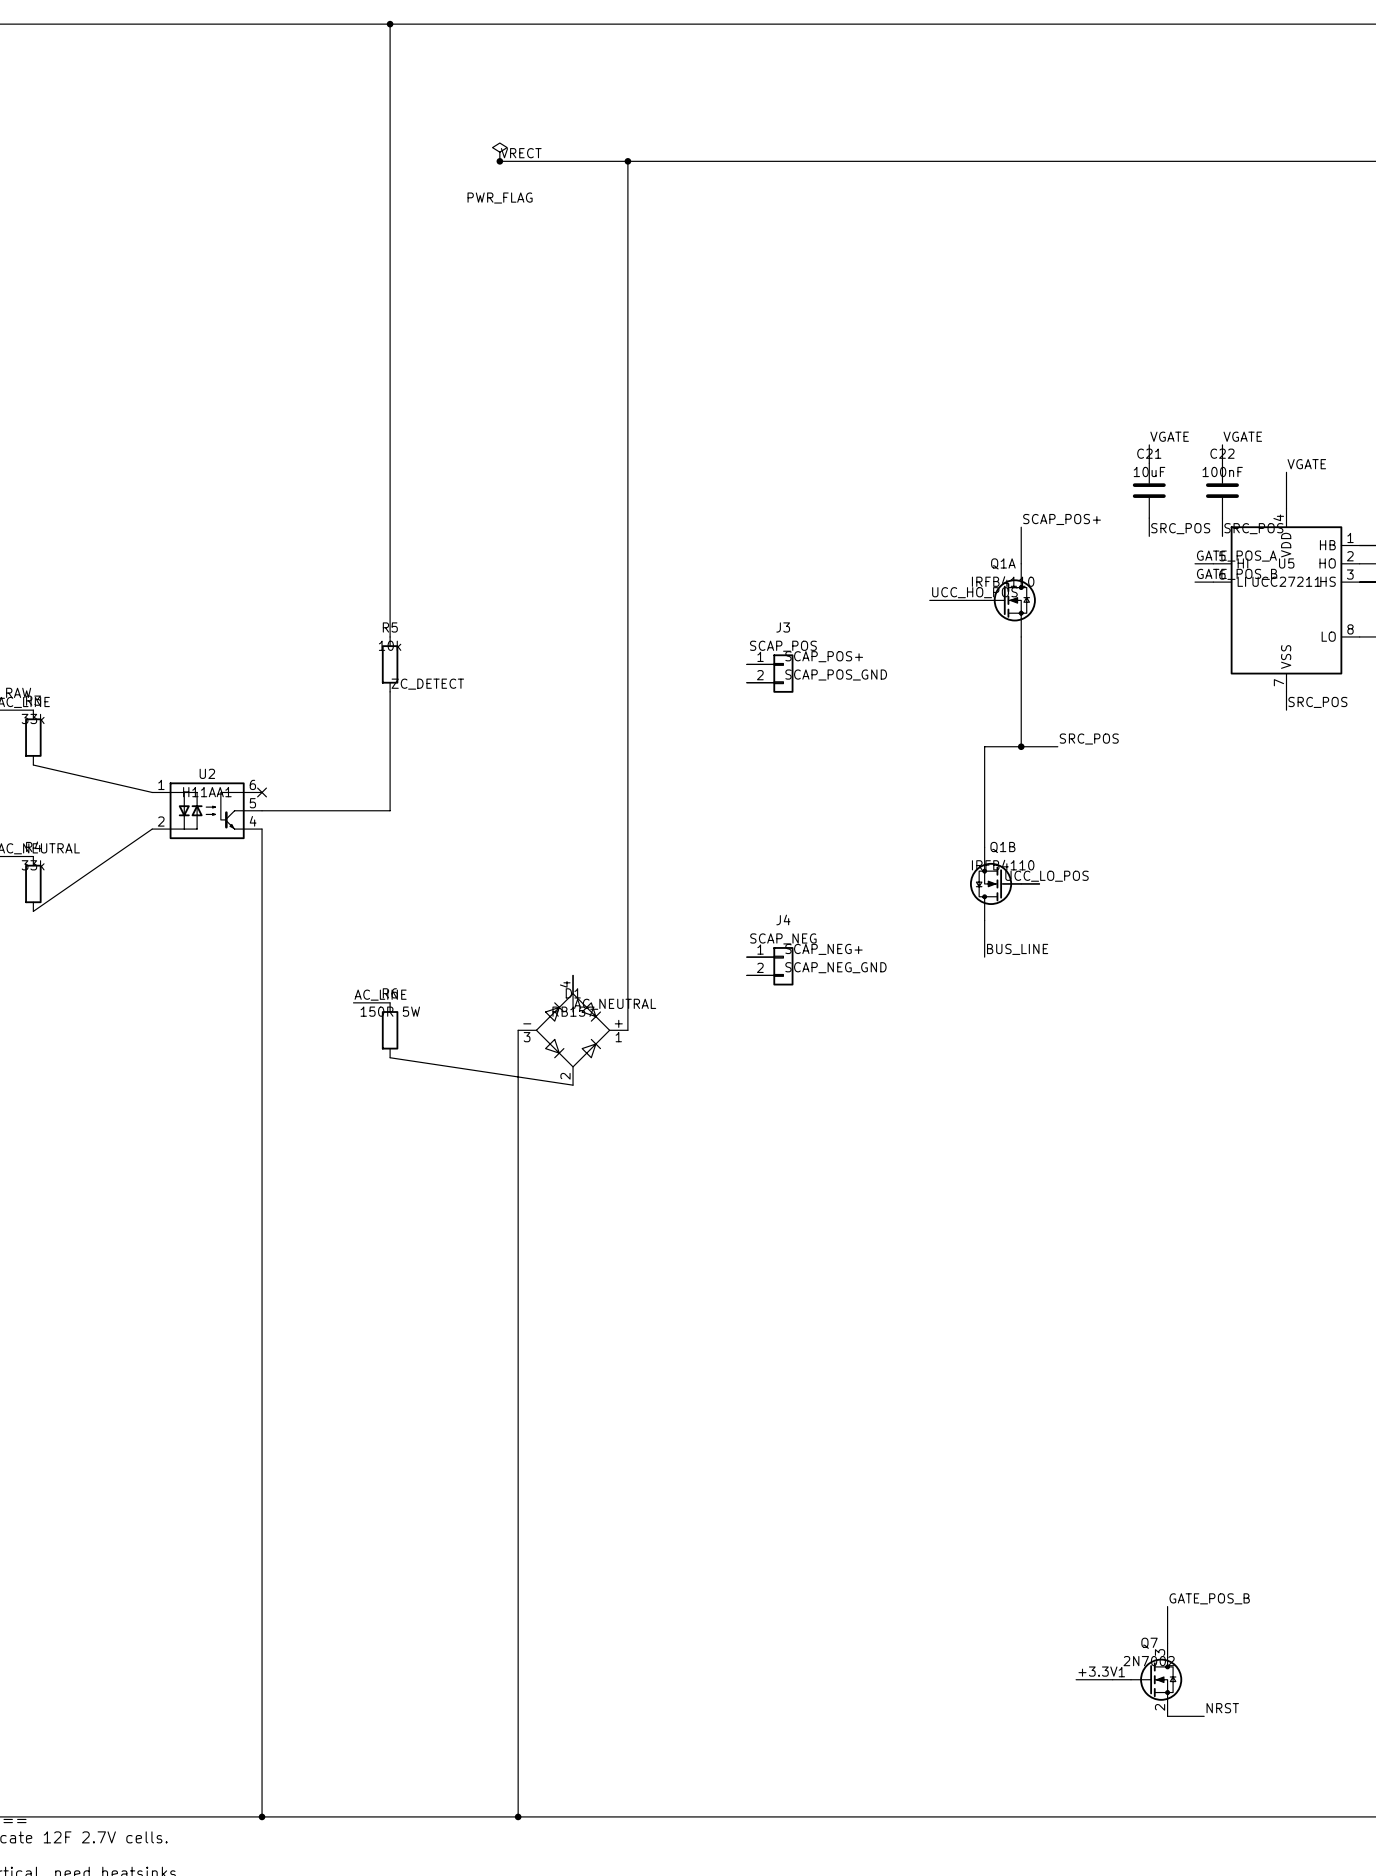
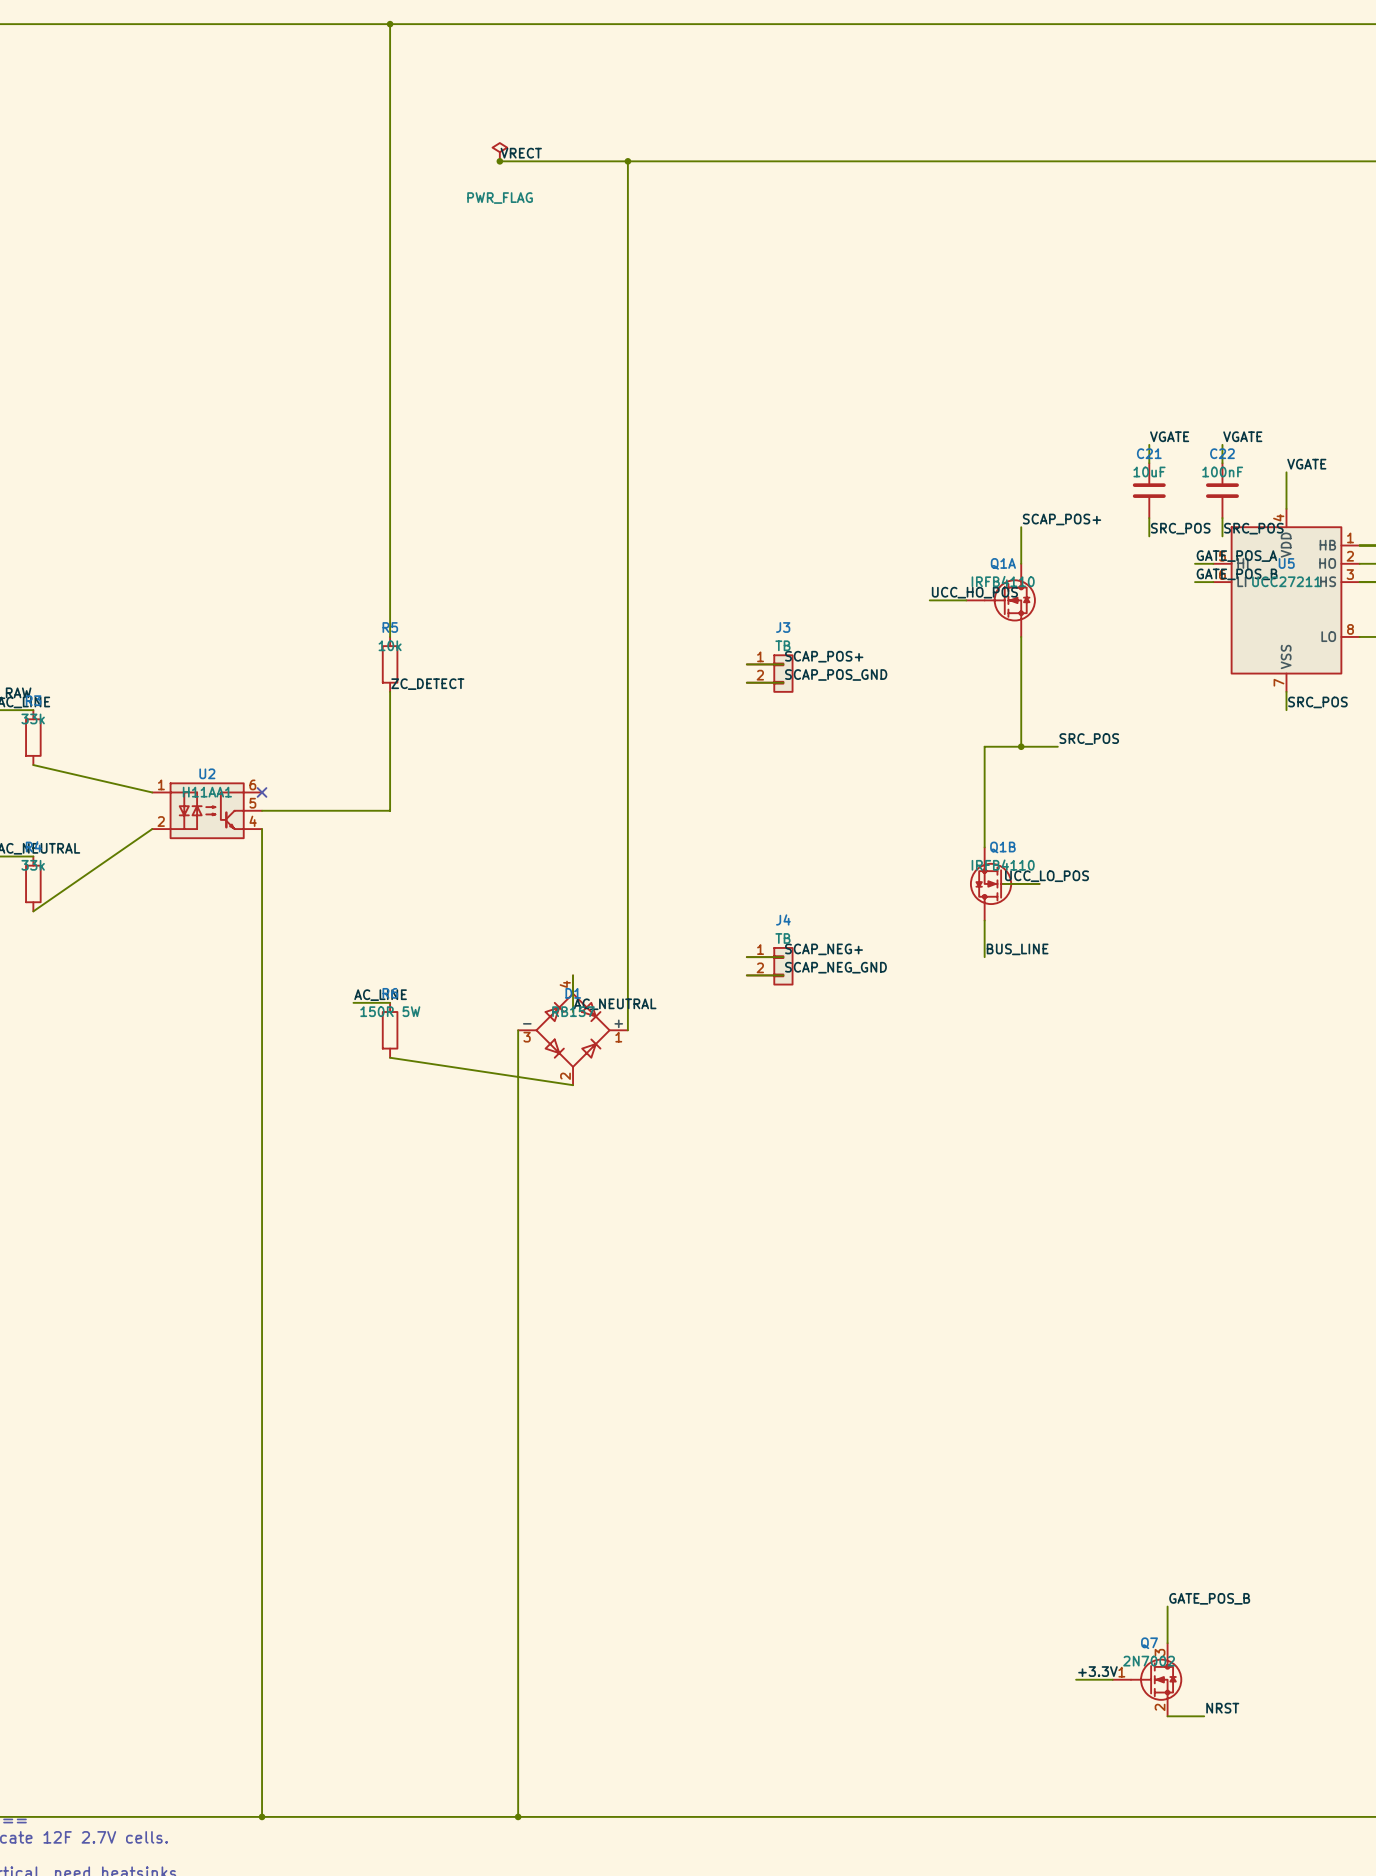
J3 value: SCAP_POS (783, 646) -> TB (782, 645)
J4 value: SCAP_NEG (783, 938) -> TB (782, 938)

